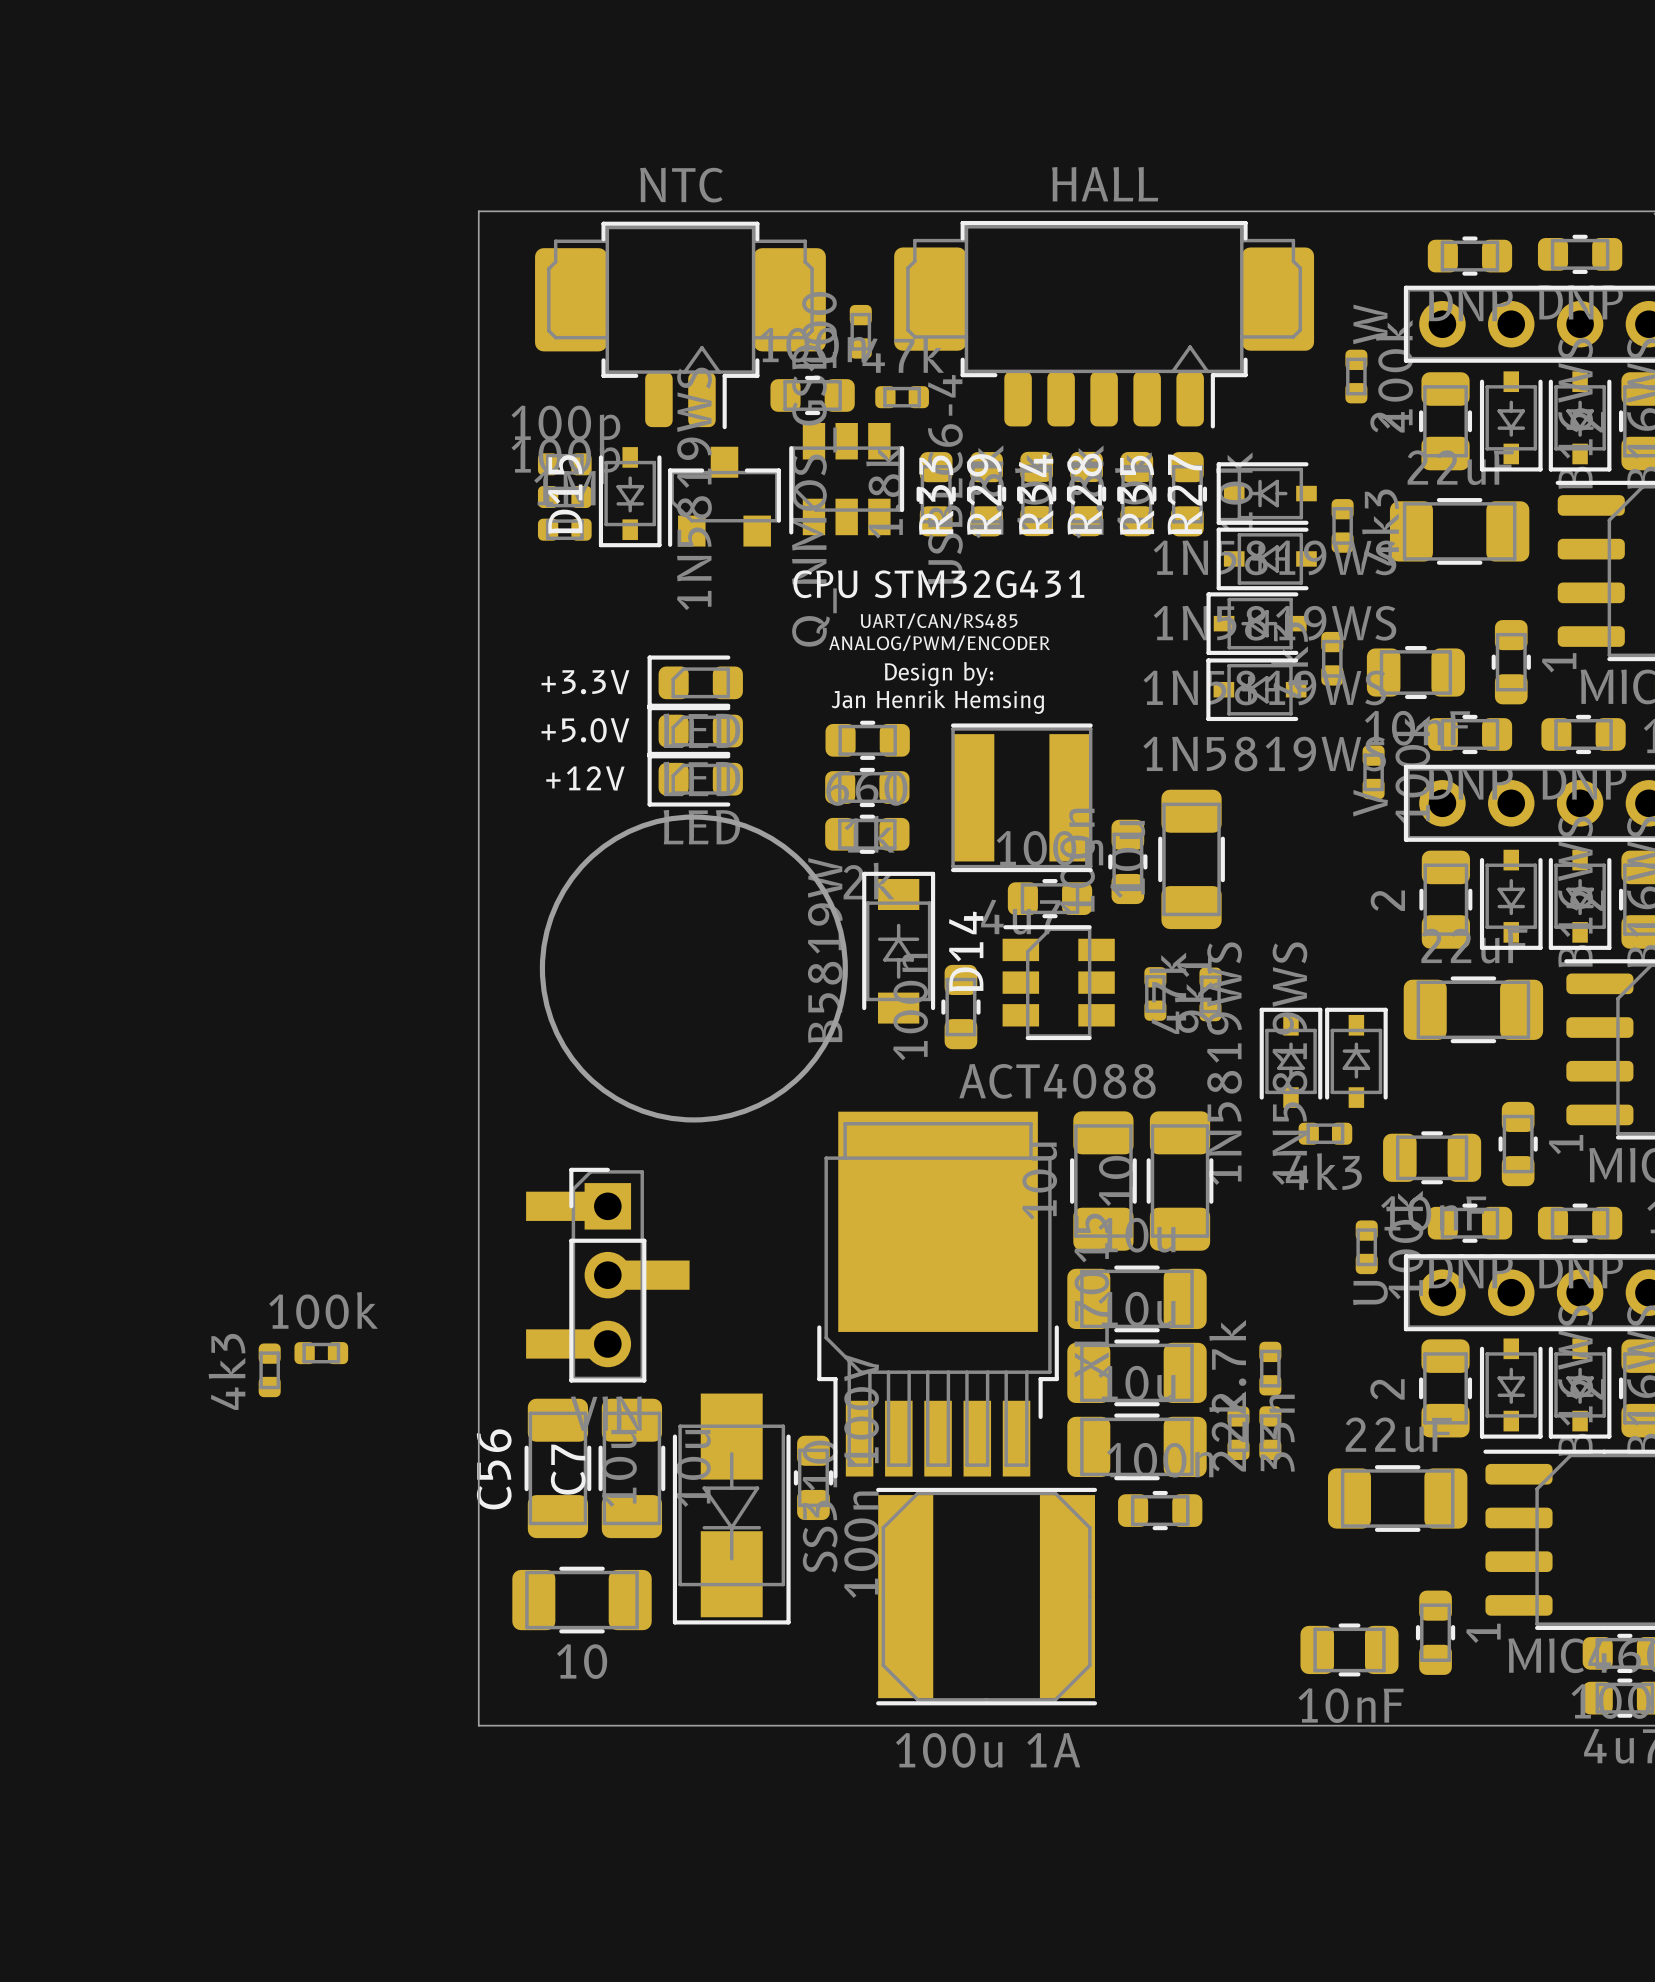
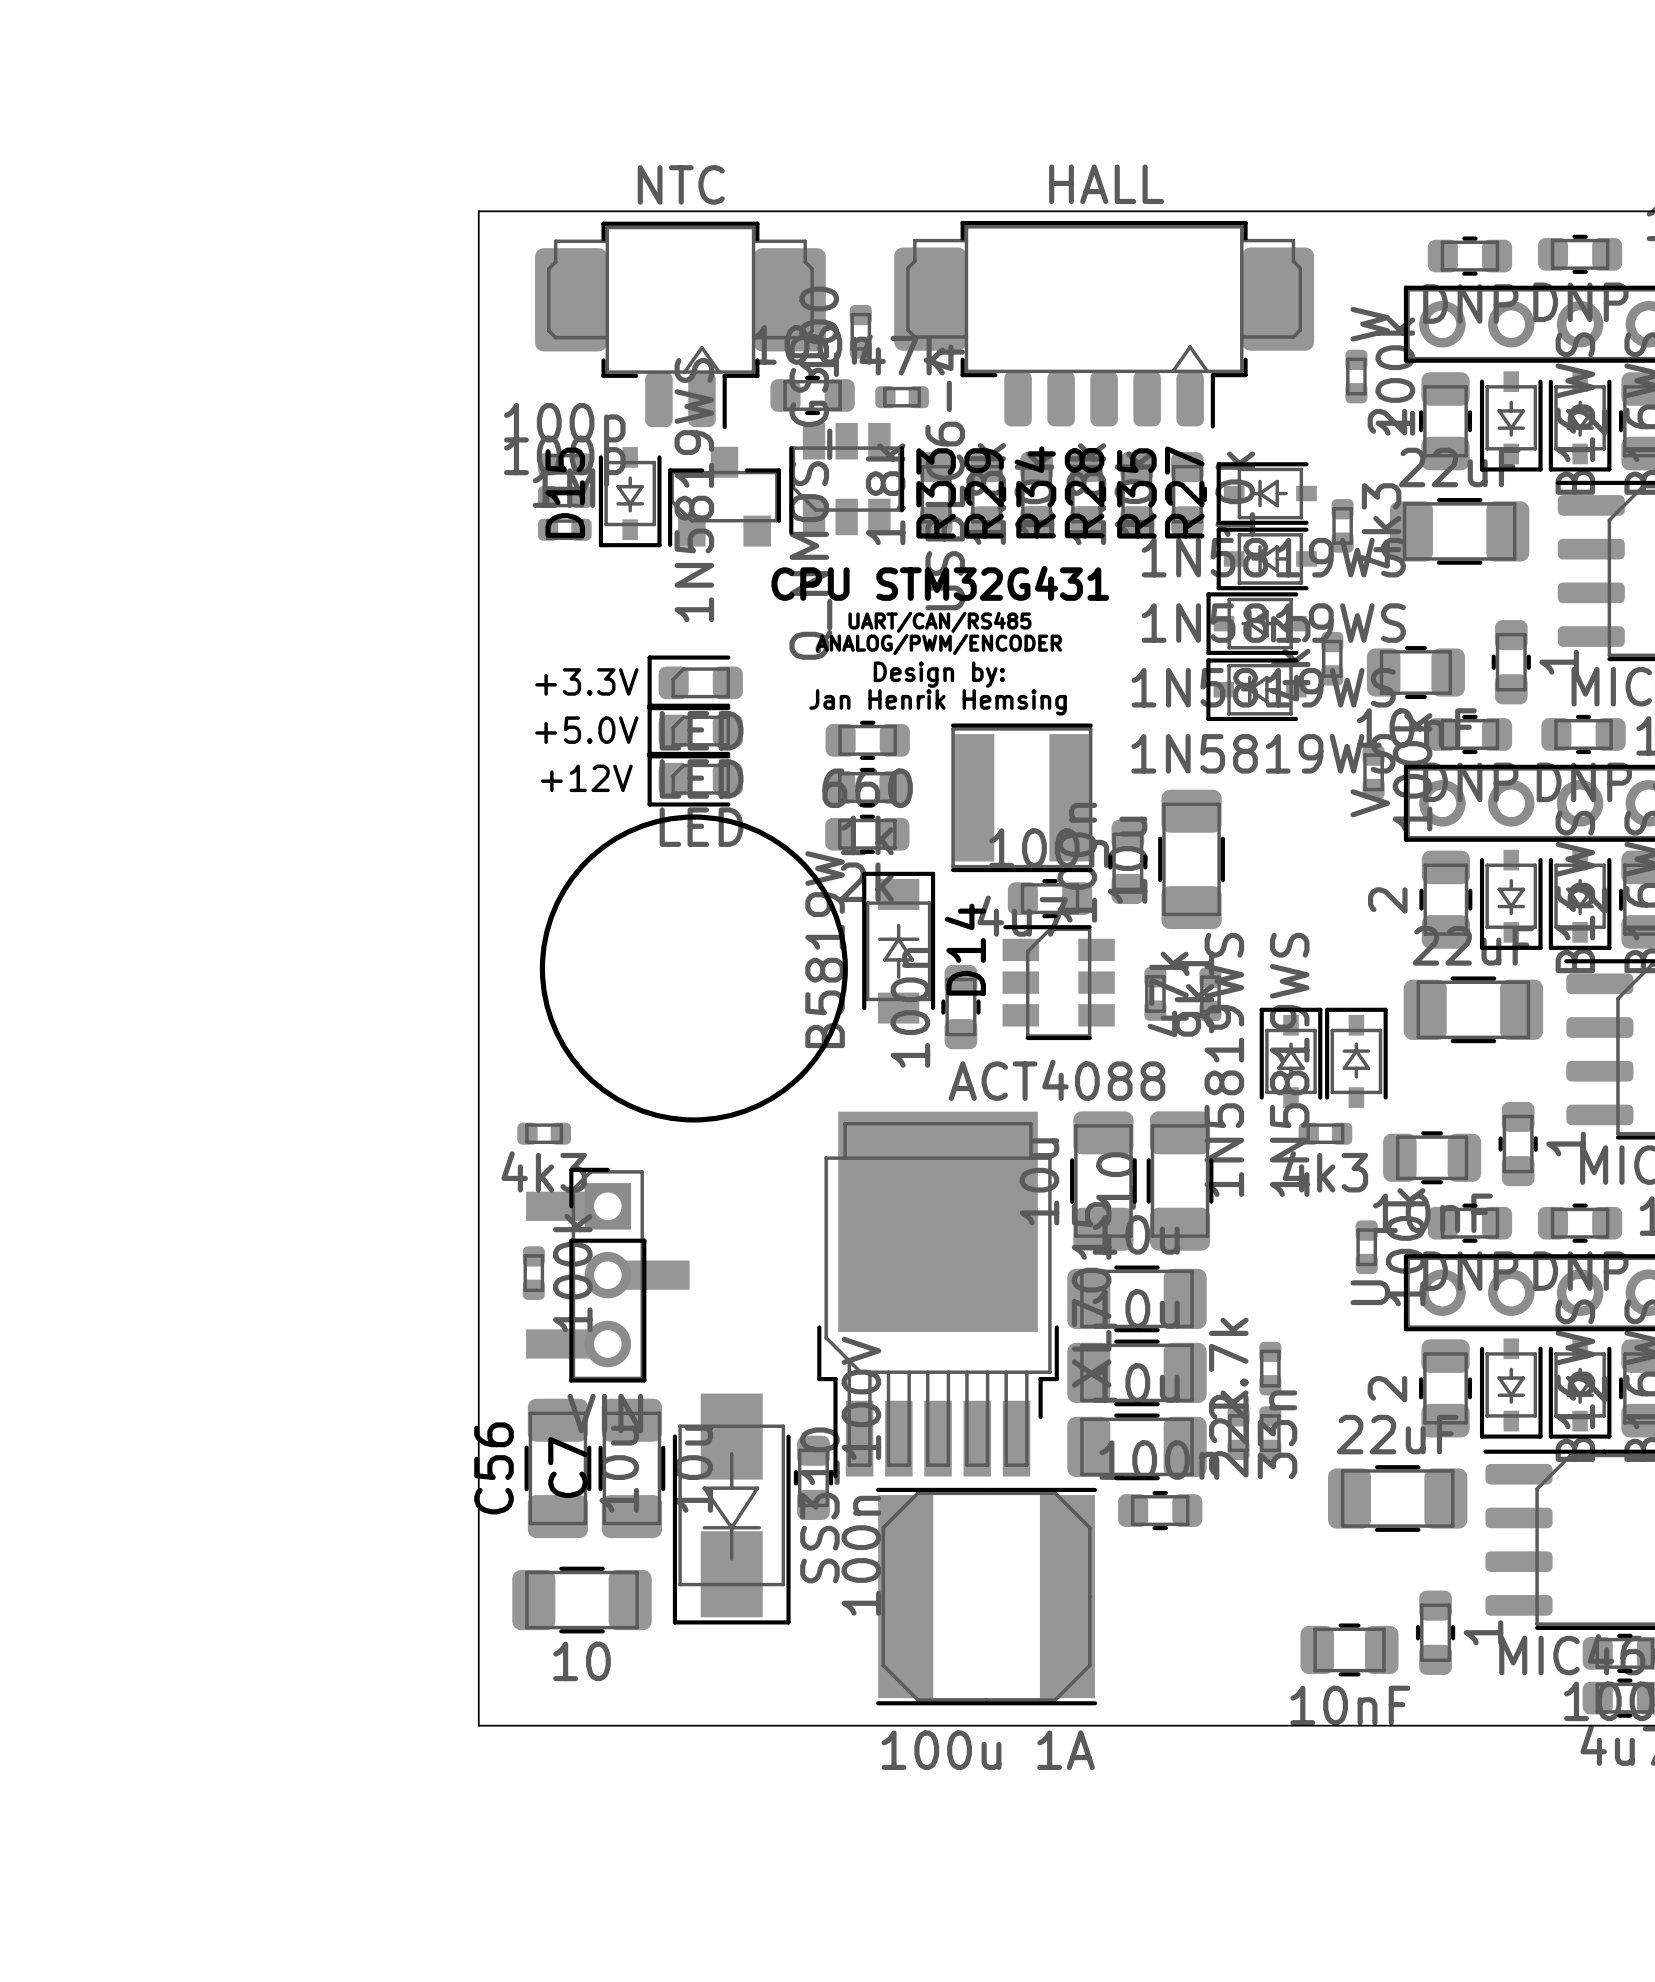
part rotation: 0° (321, 1353) -> 90° clockwise (533, 1273)
part position: (321, 1353) -> (533, 1273)
part rotation: 0° (269, 1370) -> 90° clockwise (544, 1133)
part position: (269, 1370) -> (544, 1133)

